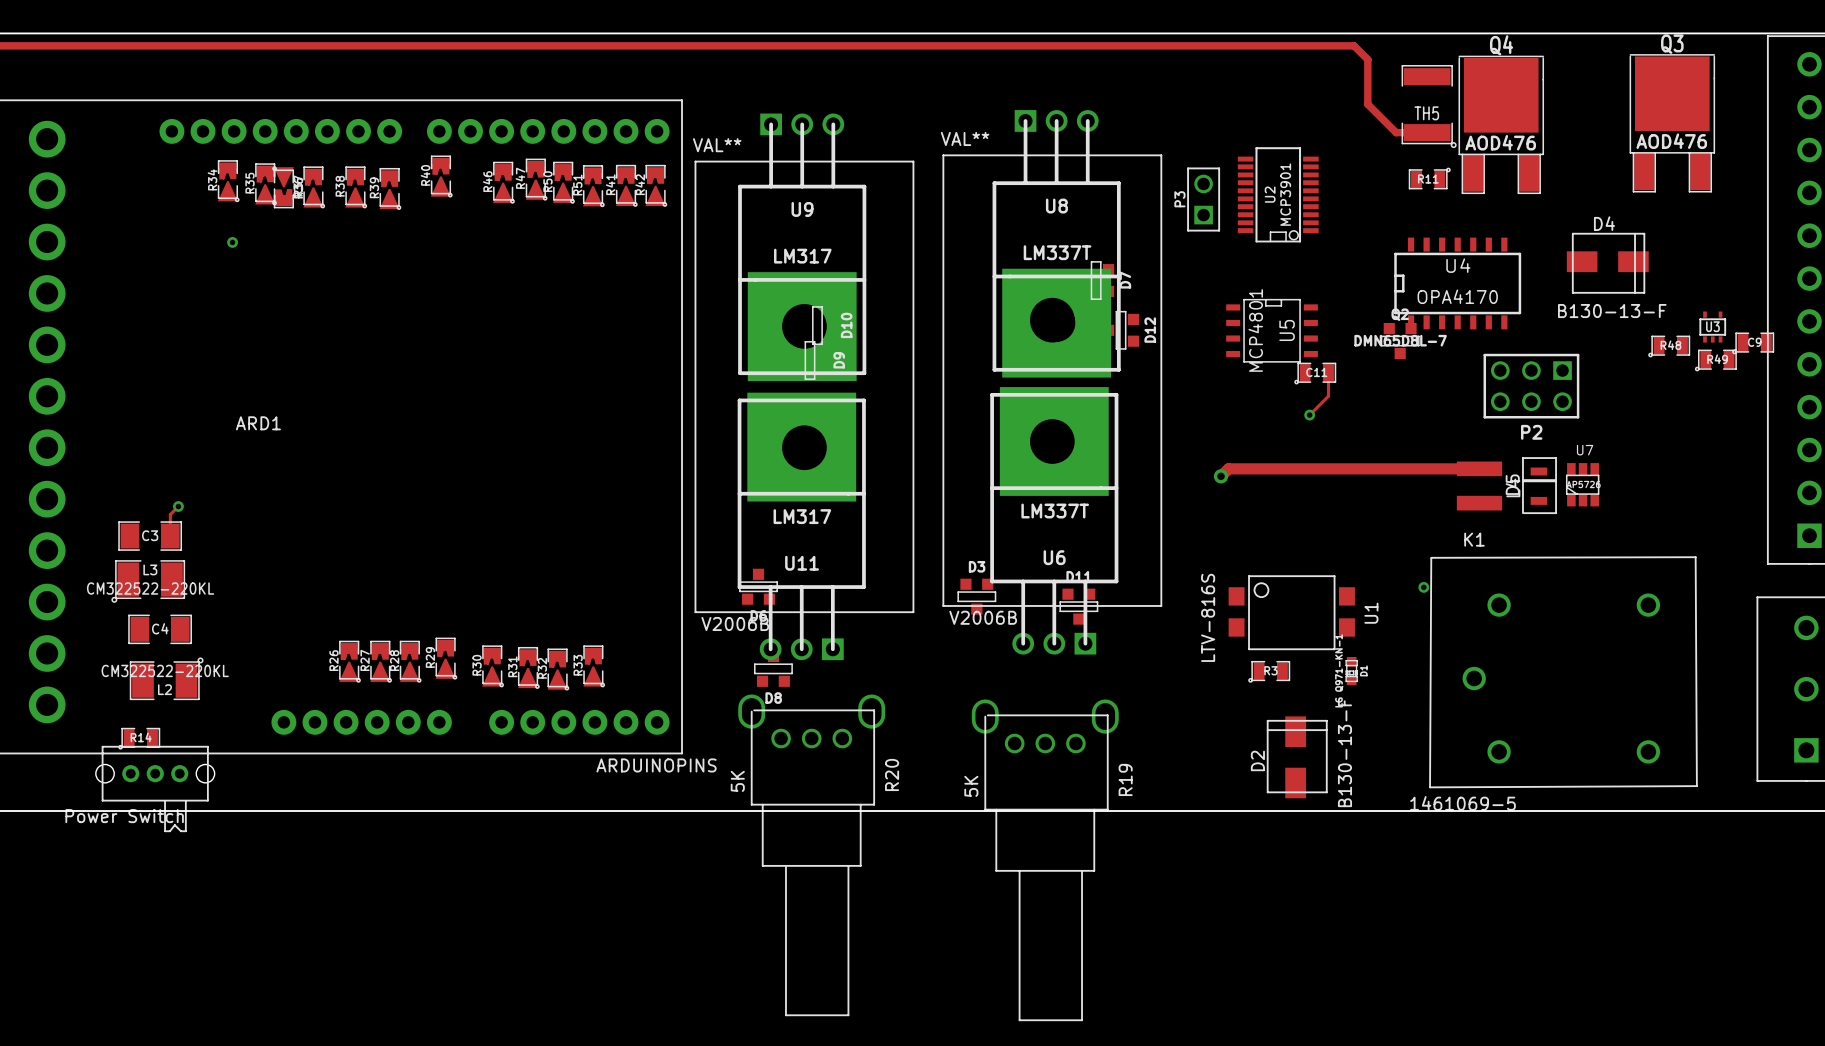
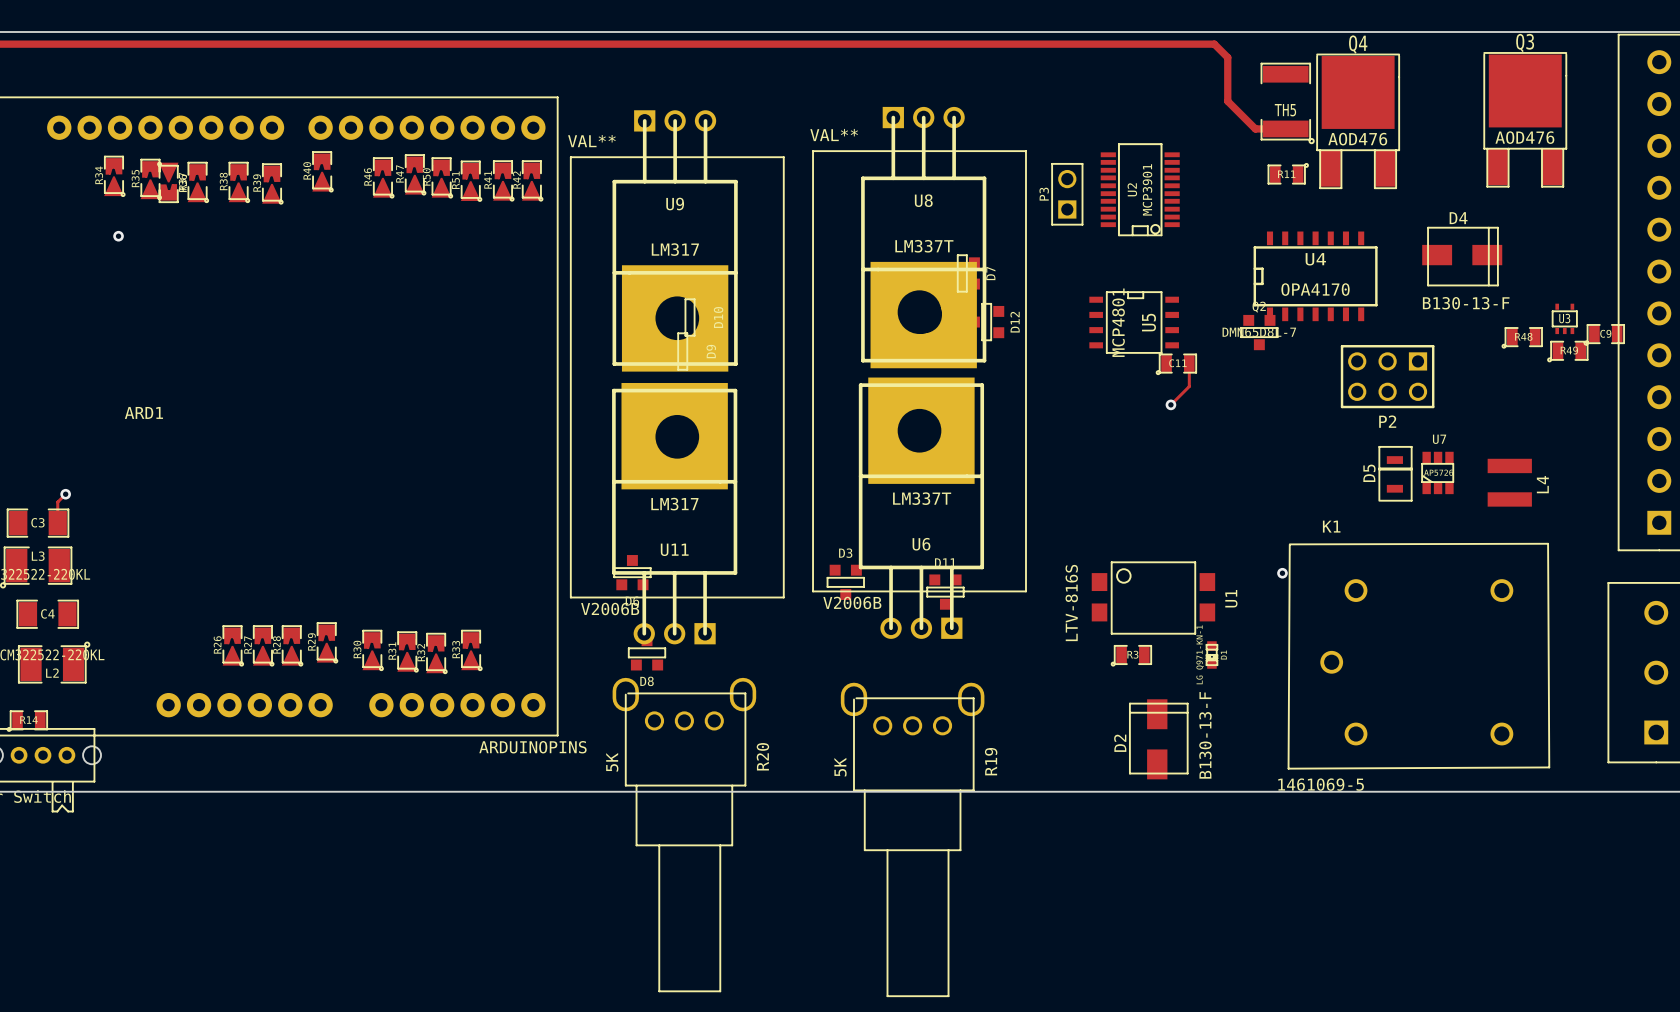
track: (1479, 468) (1228, 468) (1221, 476) -> none
via: (1221, 476) -> none
L4 position: (1479, 486) -> (1509, 482)

